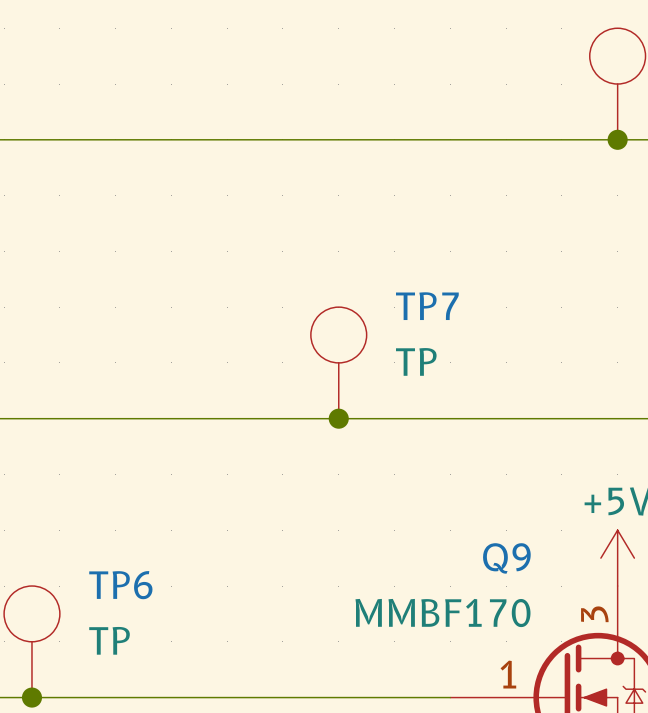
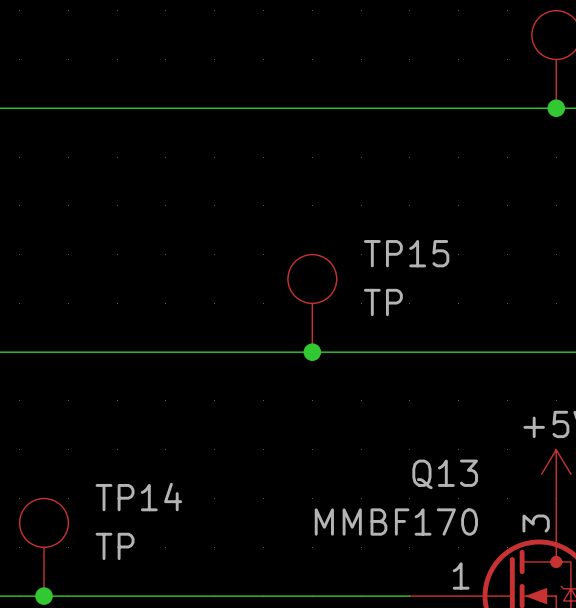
TP7 name: TP7 (427, 306) -> TP15 (406, 253)
Q9 name: Q9 (506, 558) -> Q13 (445, 474)
TP6 name: TP6 (120, 585) -> TP14 (138, 497)

